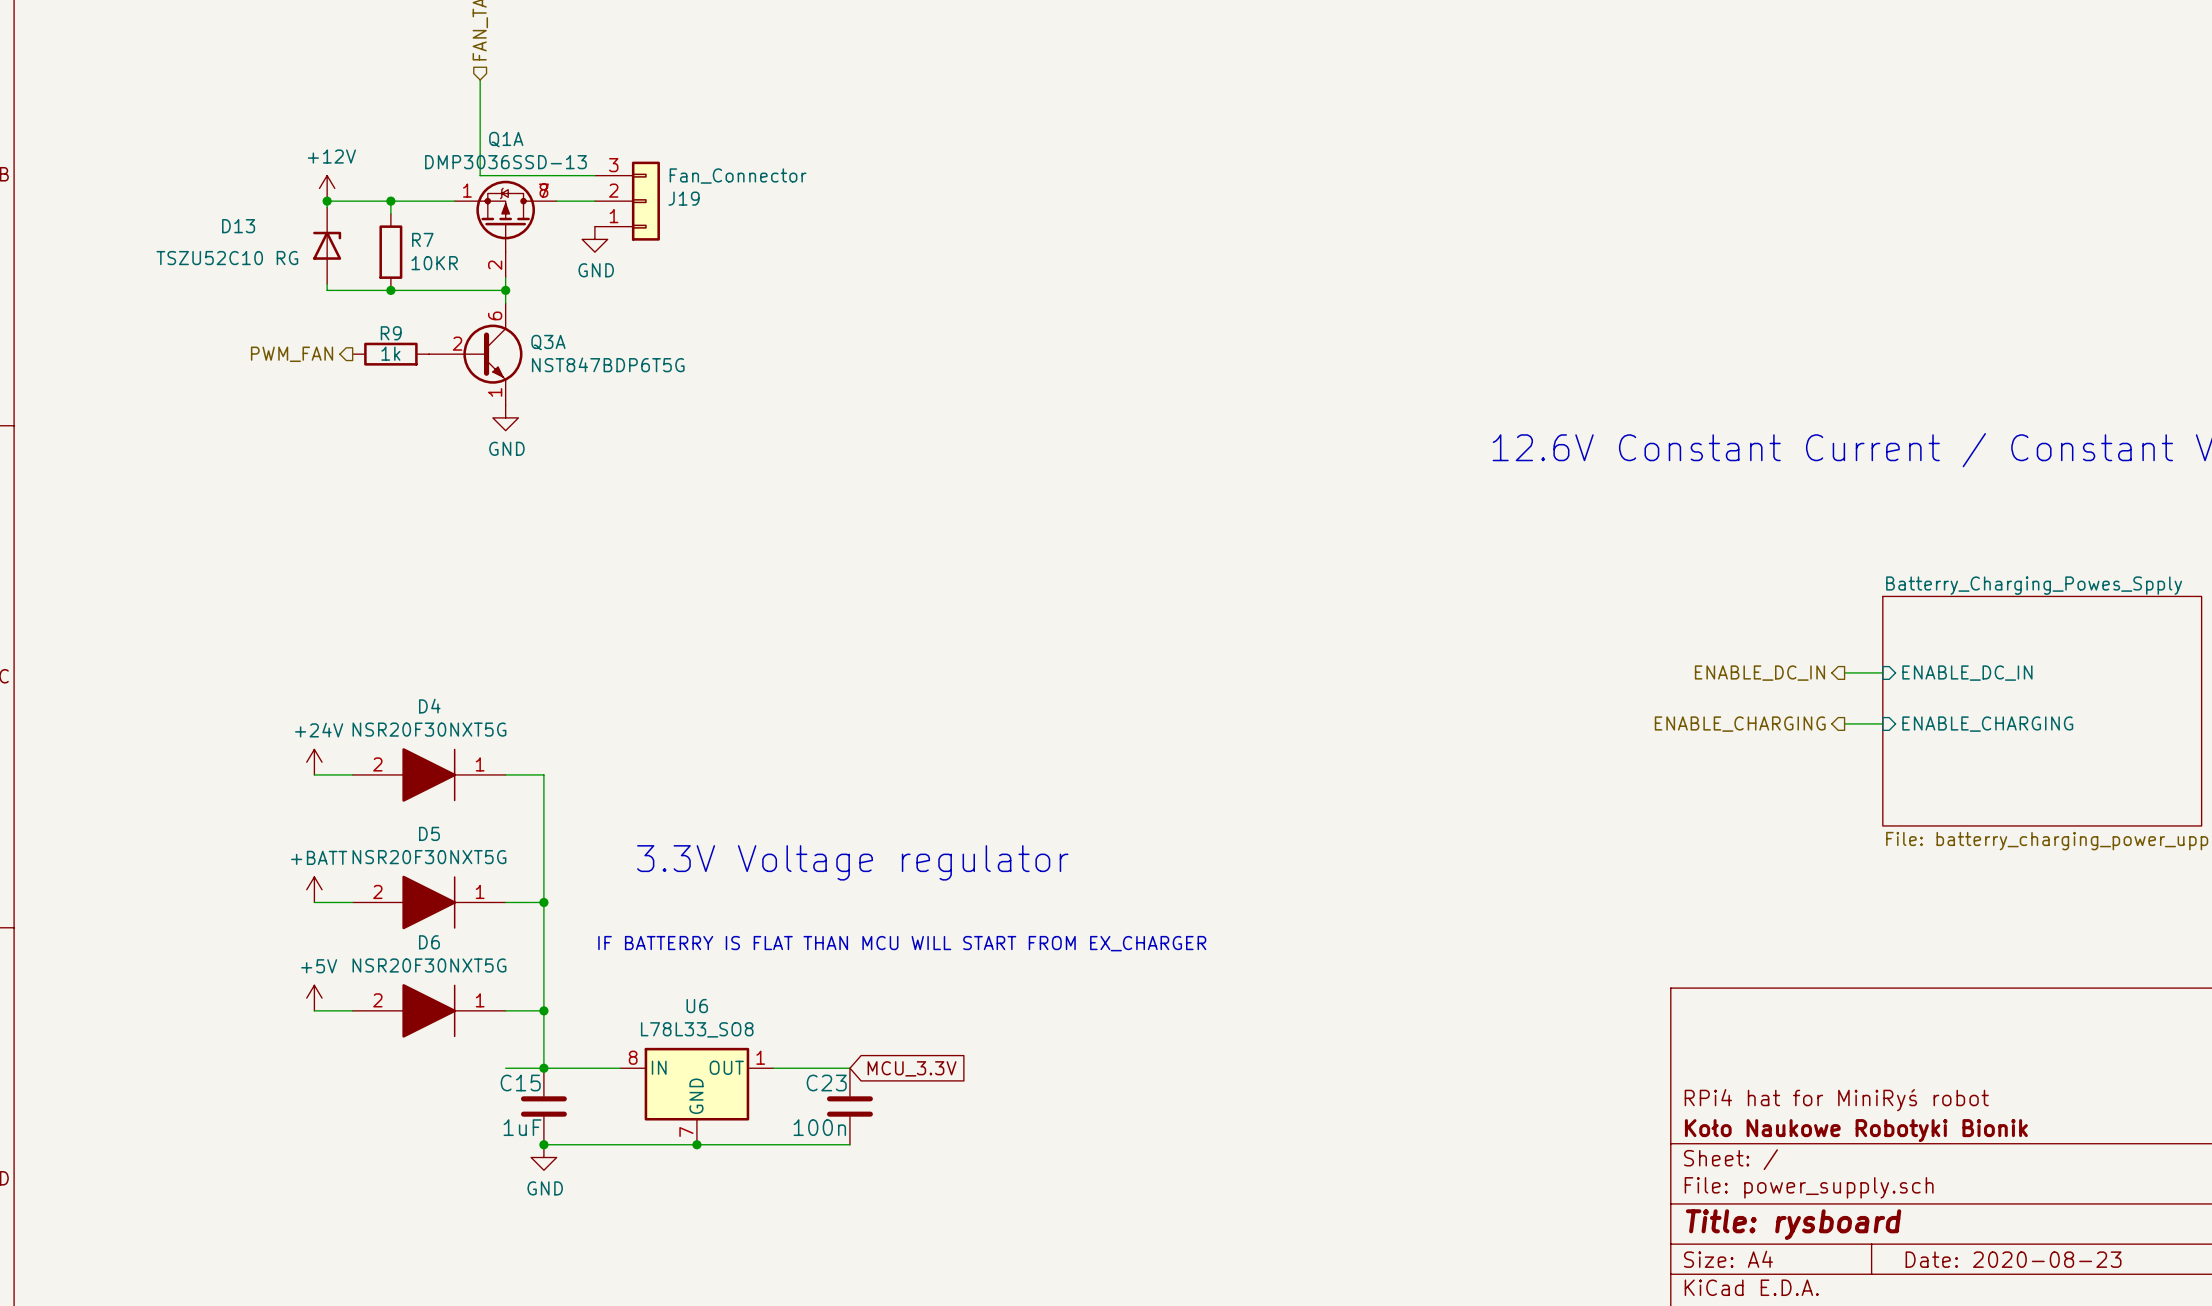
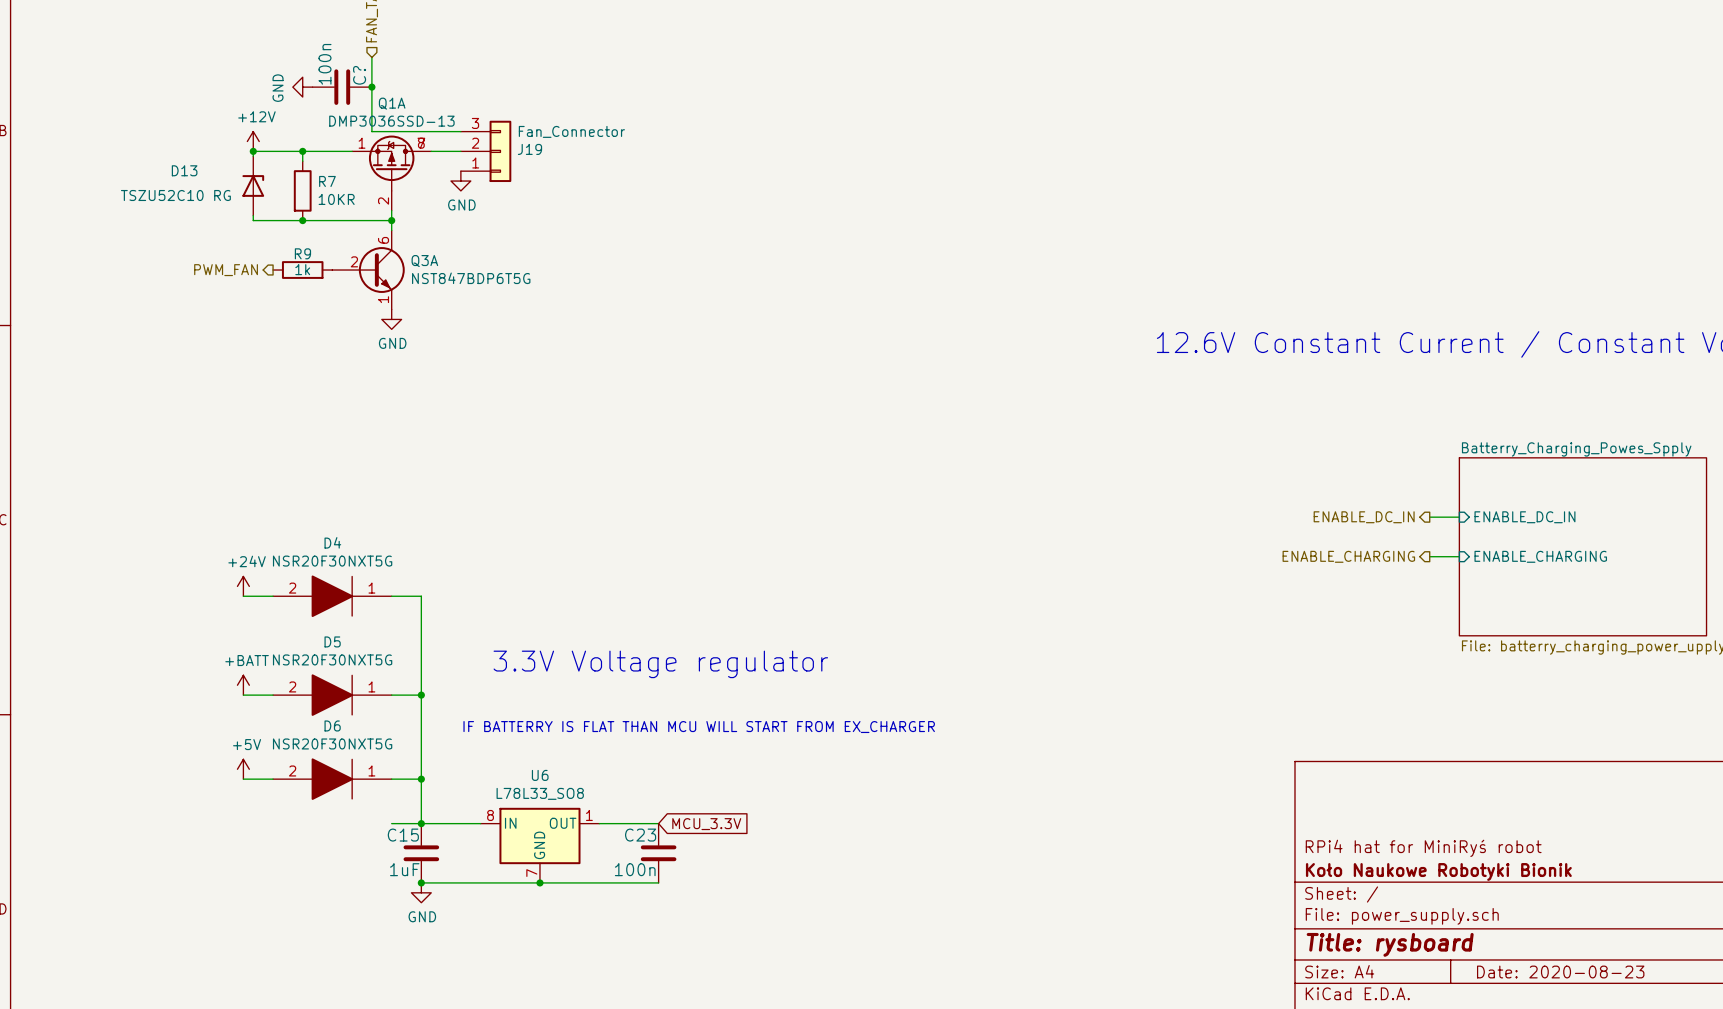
power symbol: none -> GND (302, 87)
C?: none -> 100n (342, 87)
junction: none -> (371, 87)

